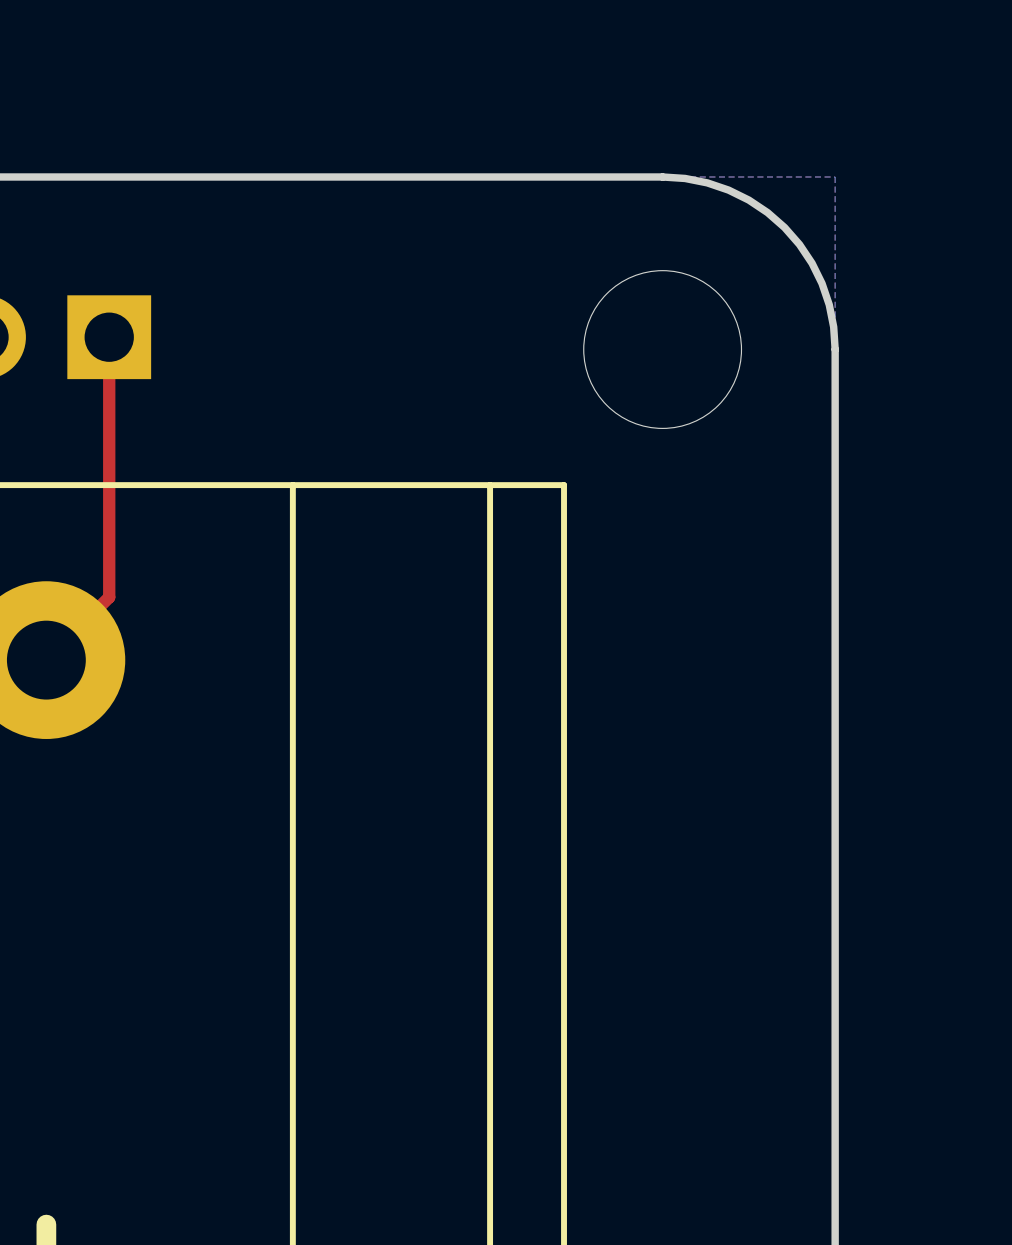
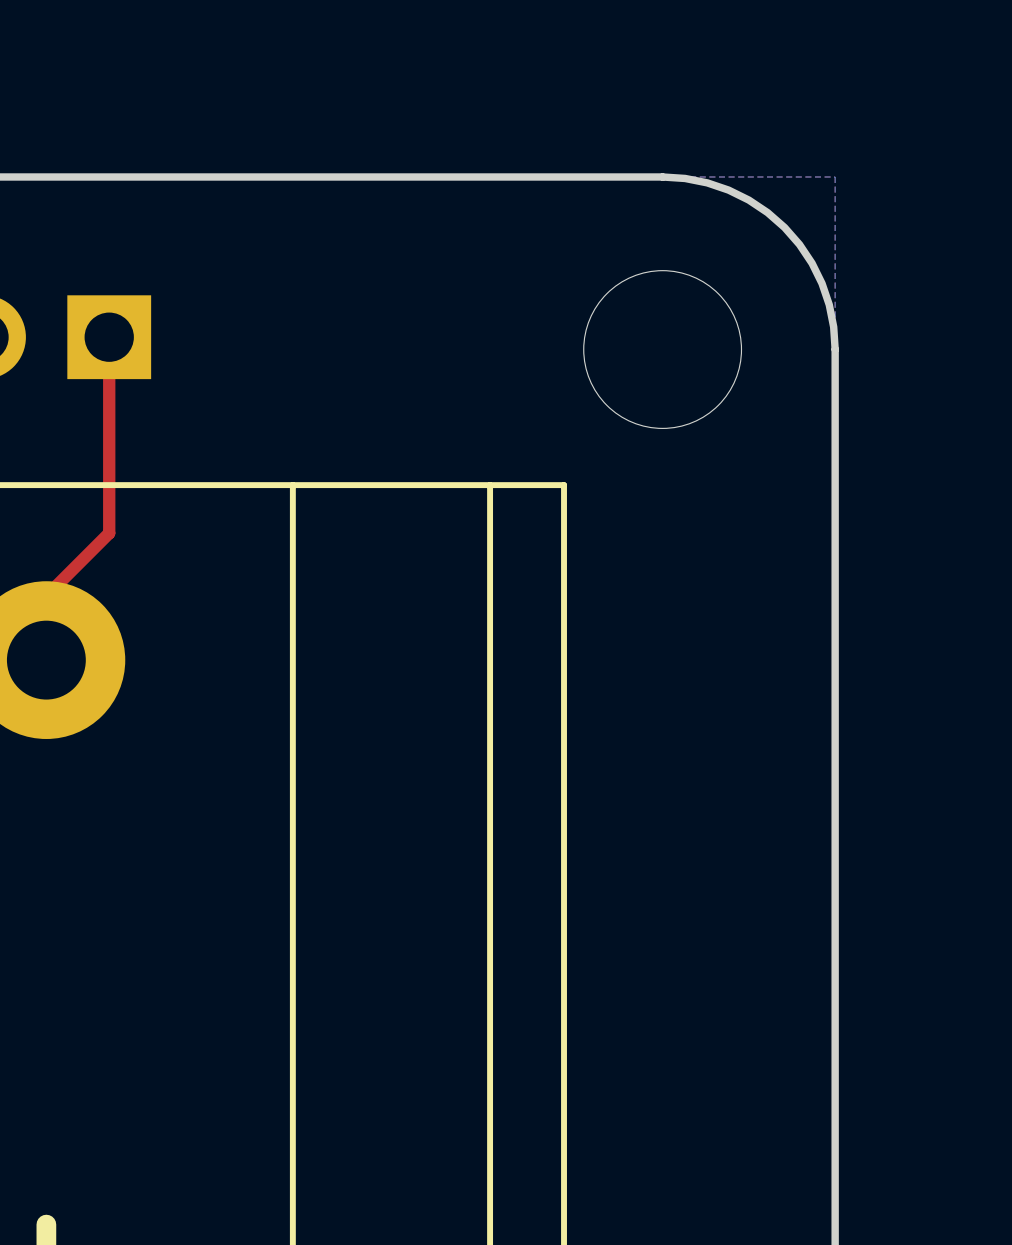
top track: (109, 533) (109, 597) (46, 660) -> (109, 533) (46, 596) (46, 660)

